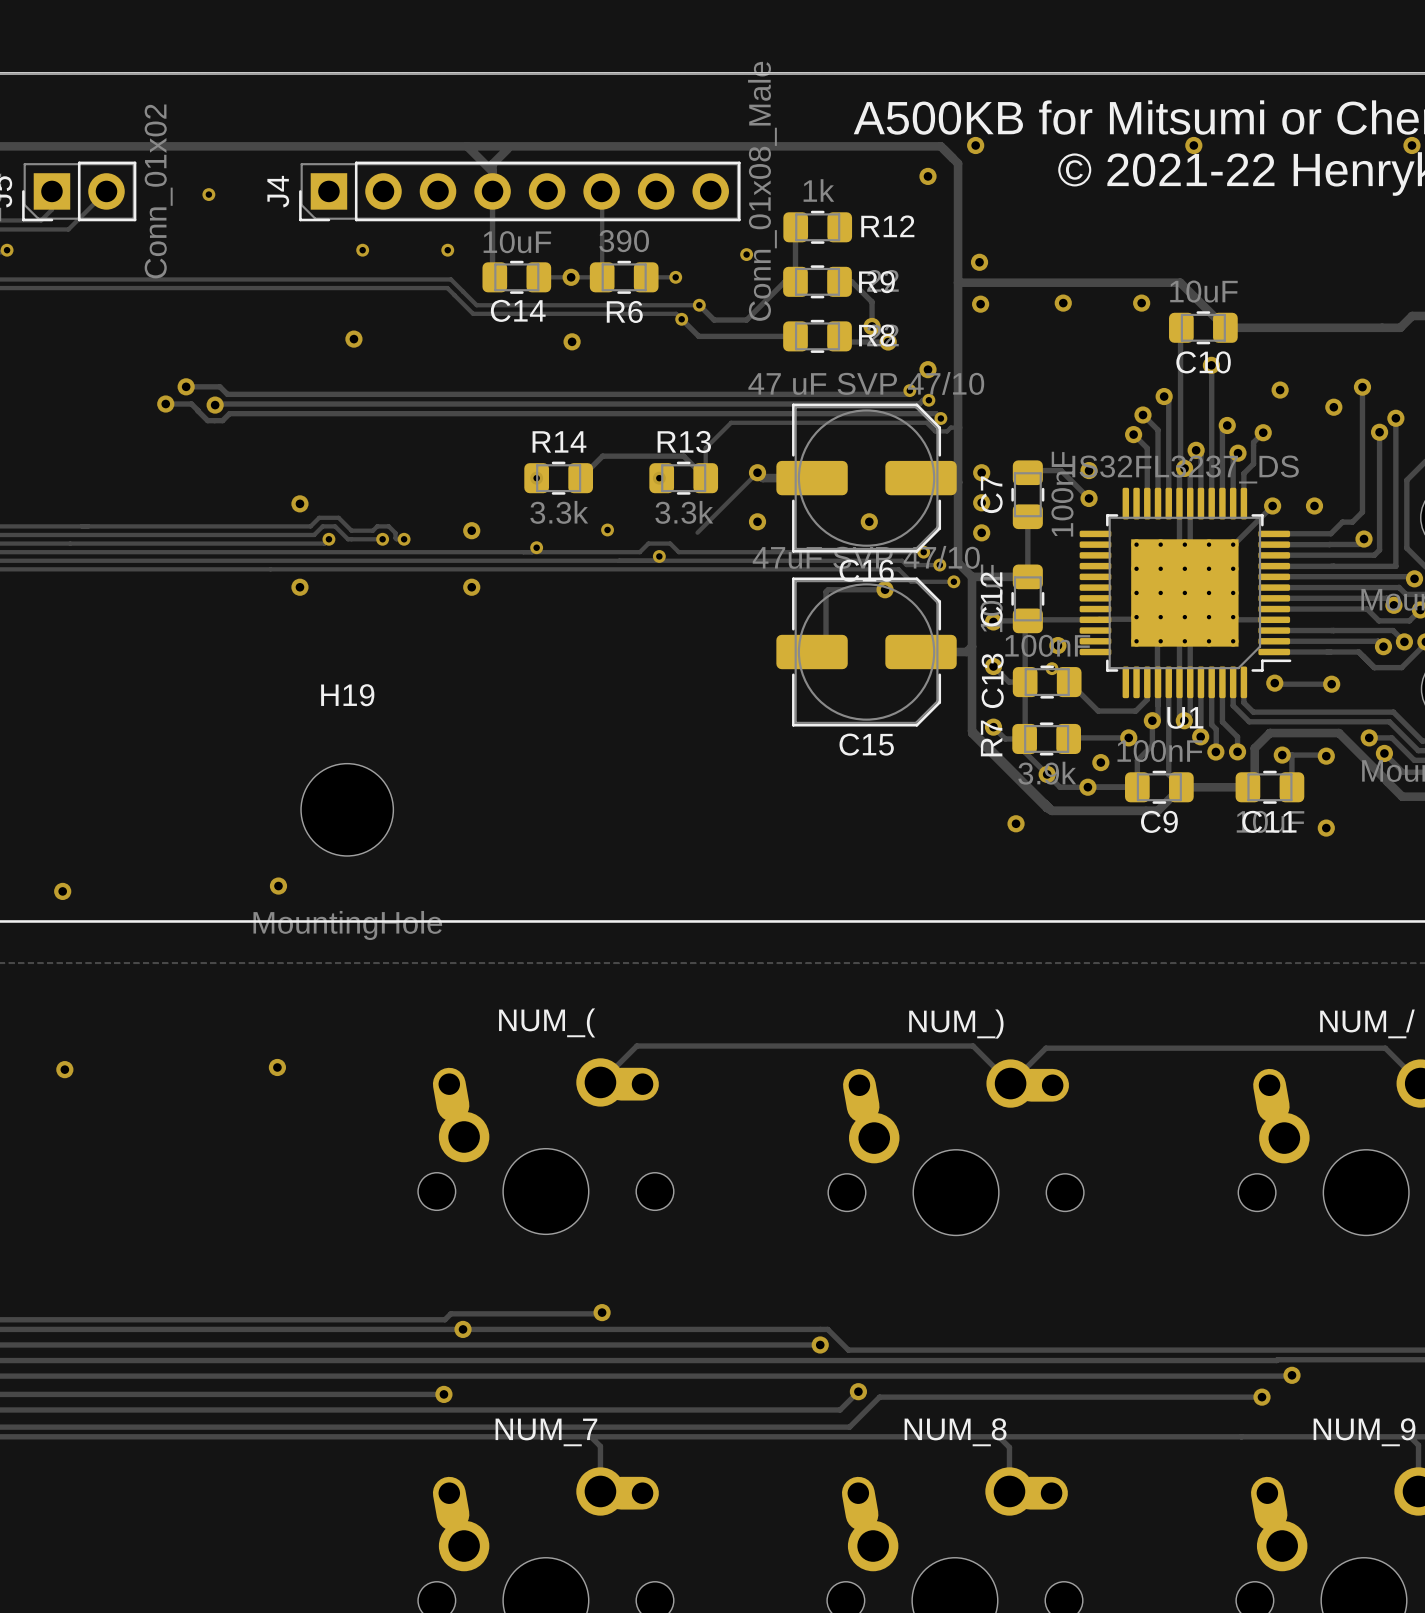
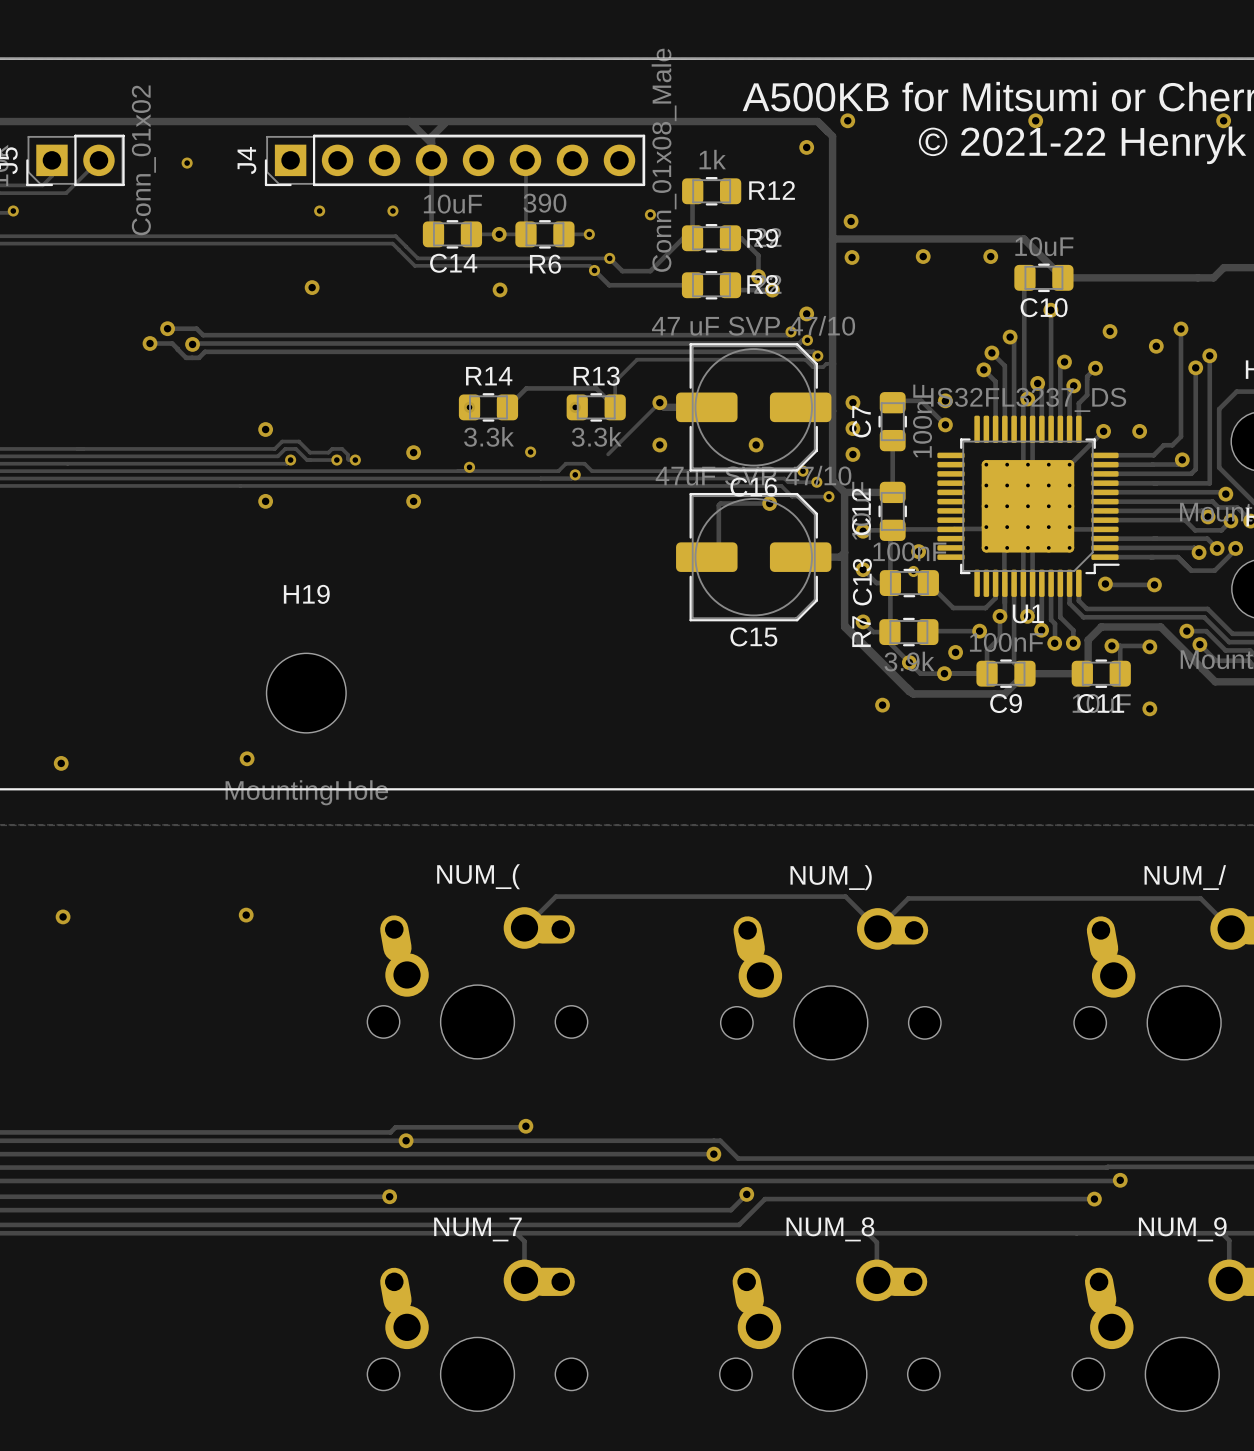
U1 footprint: [1079, 487, 1292, 699] -> [937, 415, 1120, 597]

